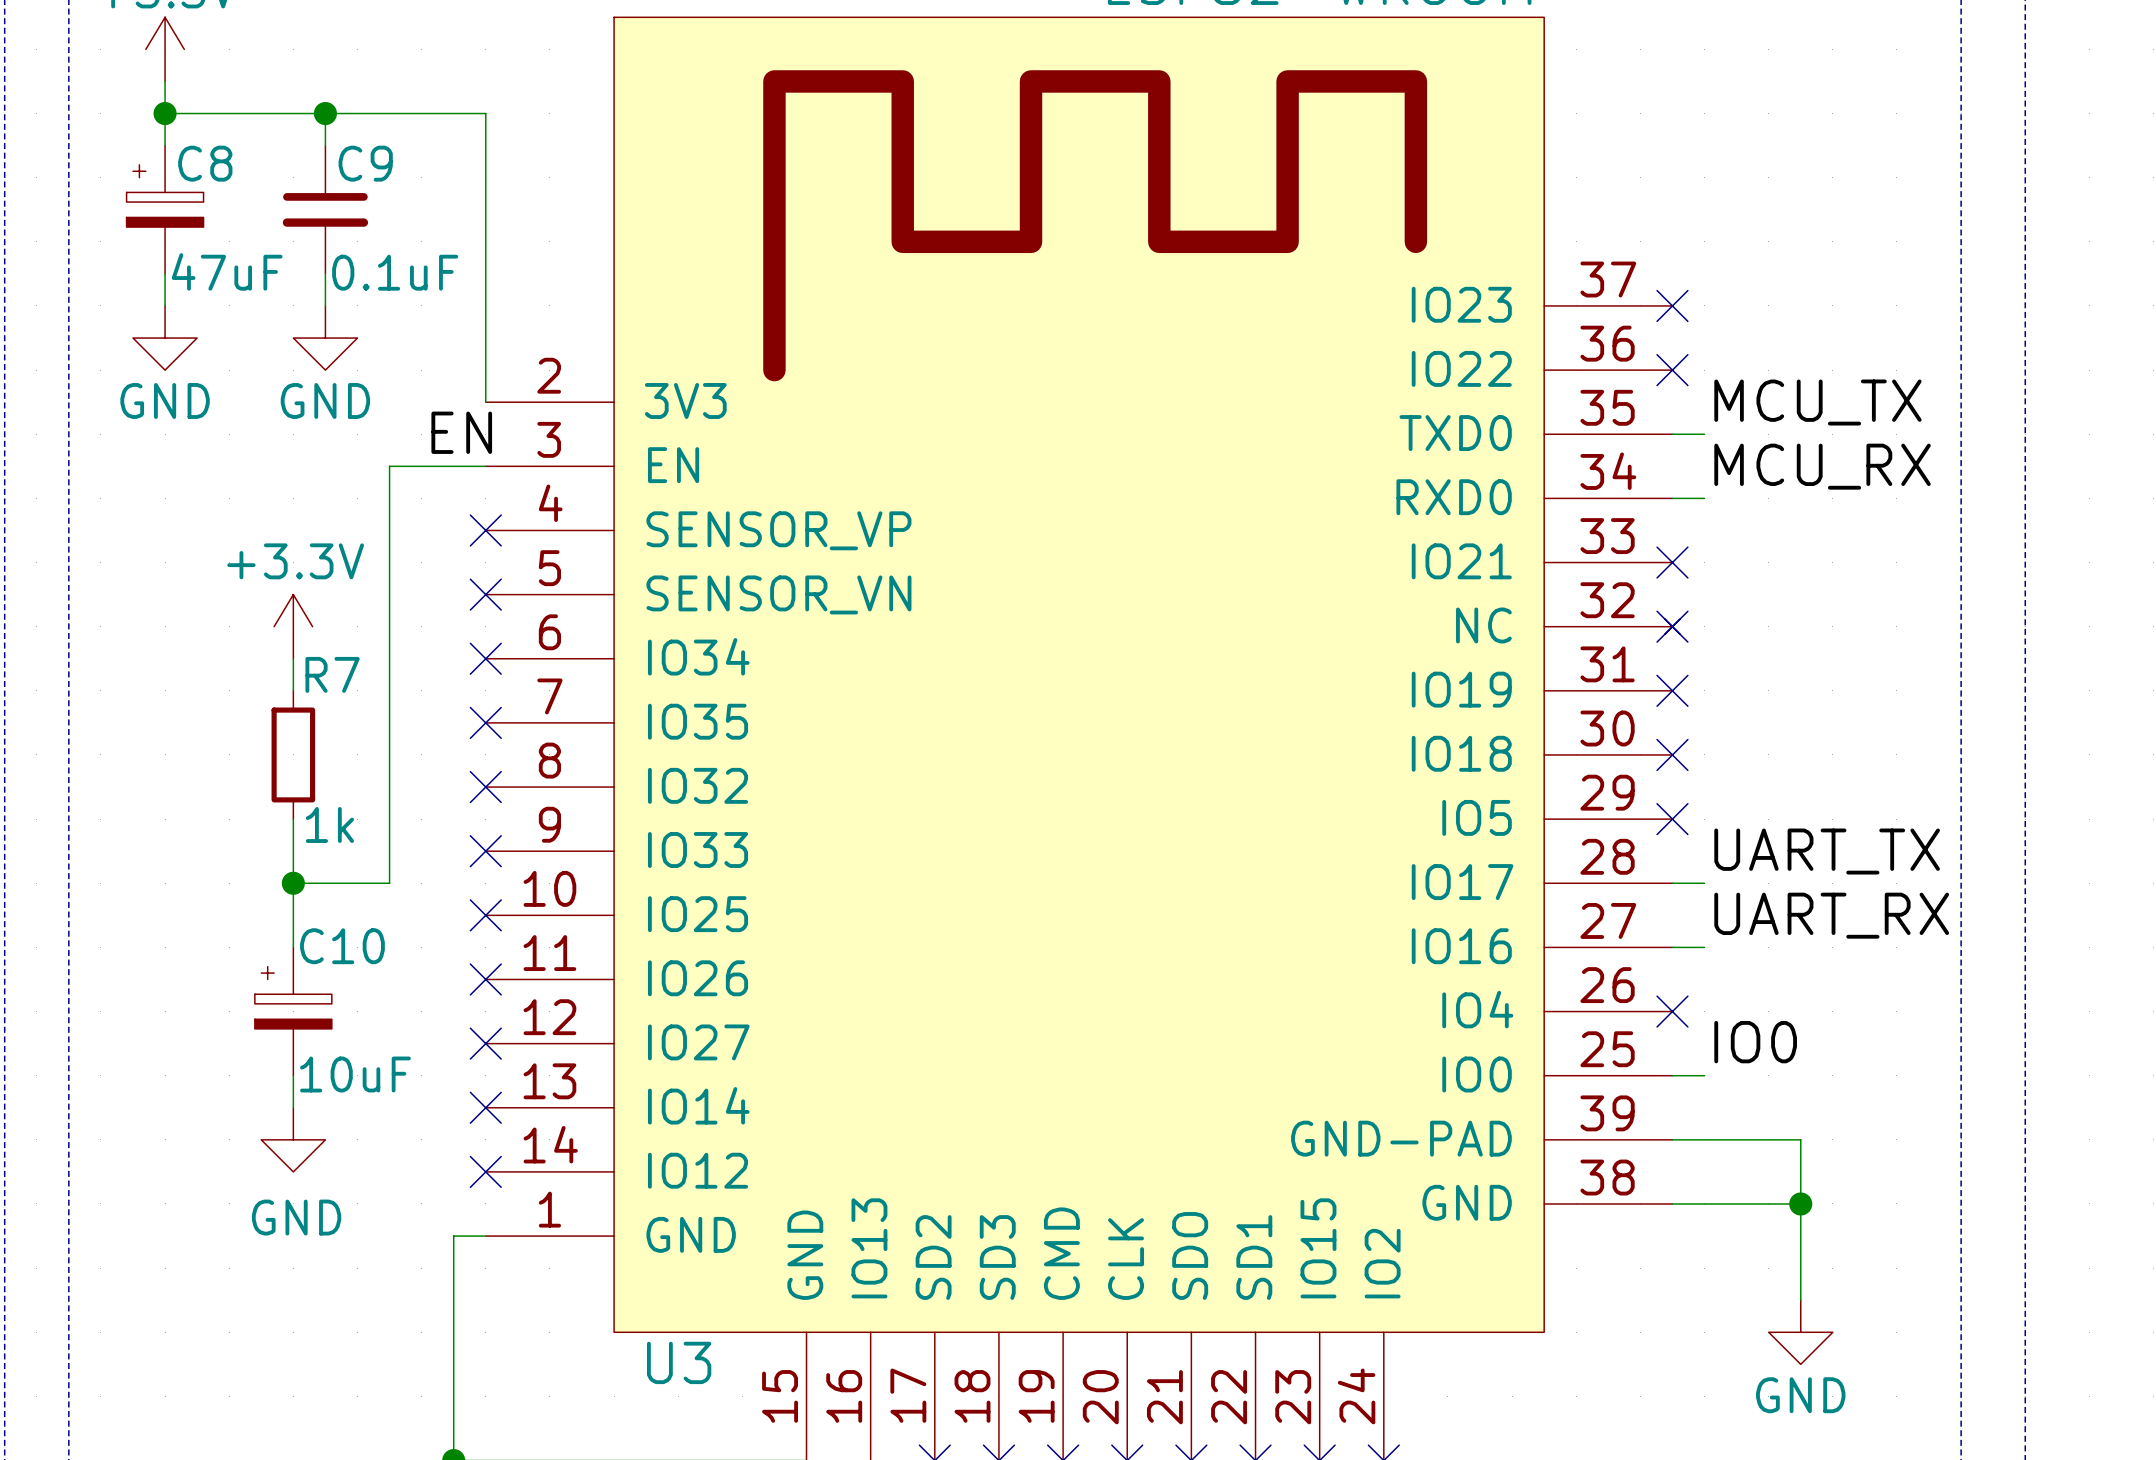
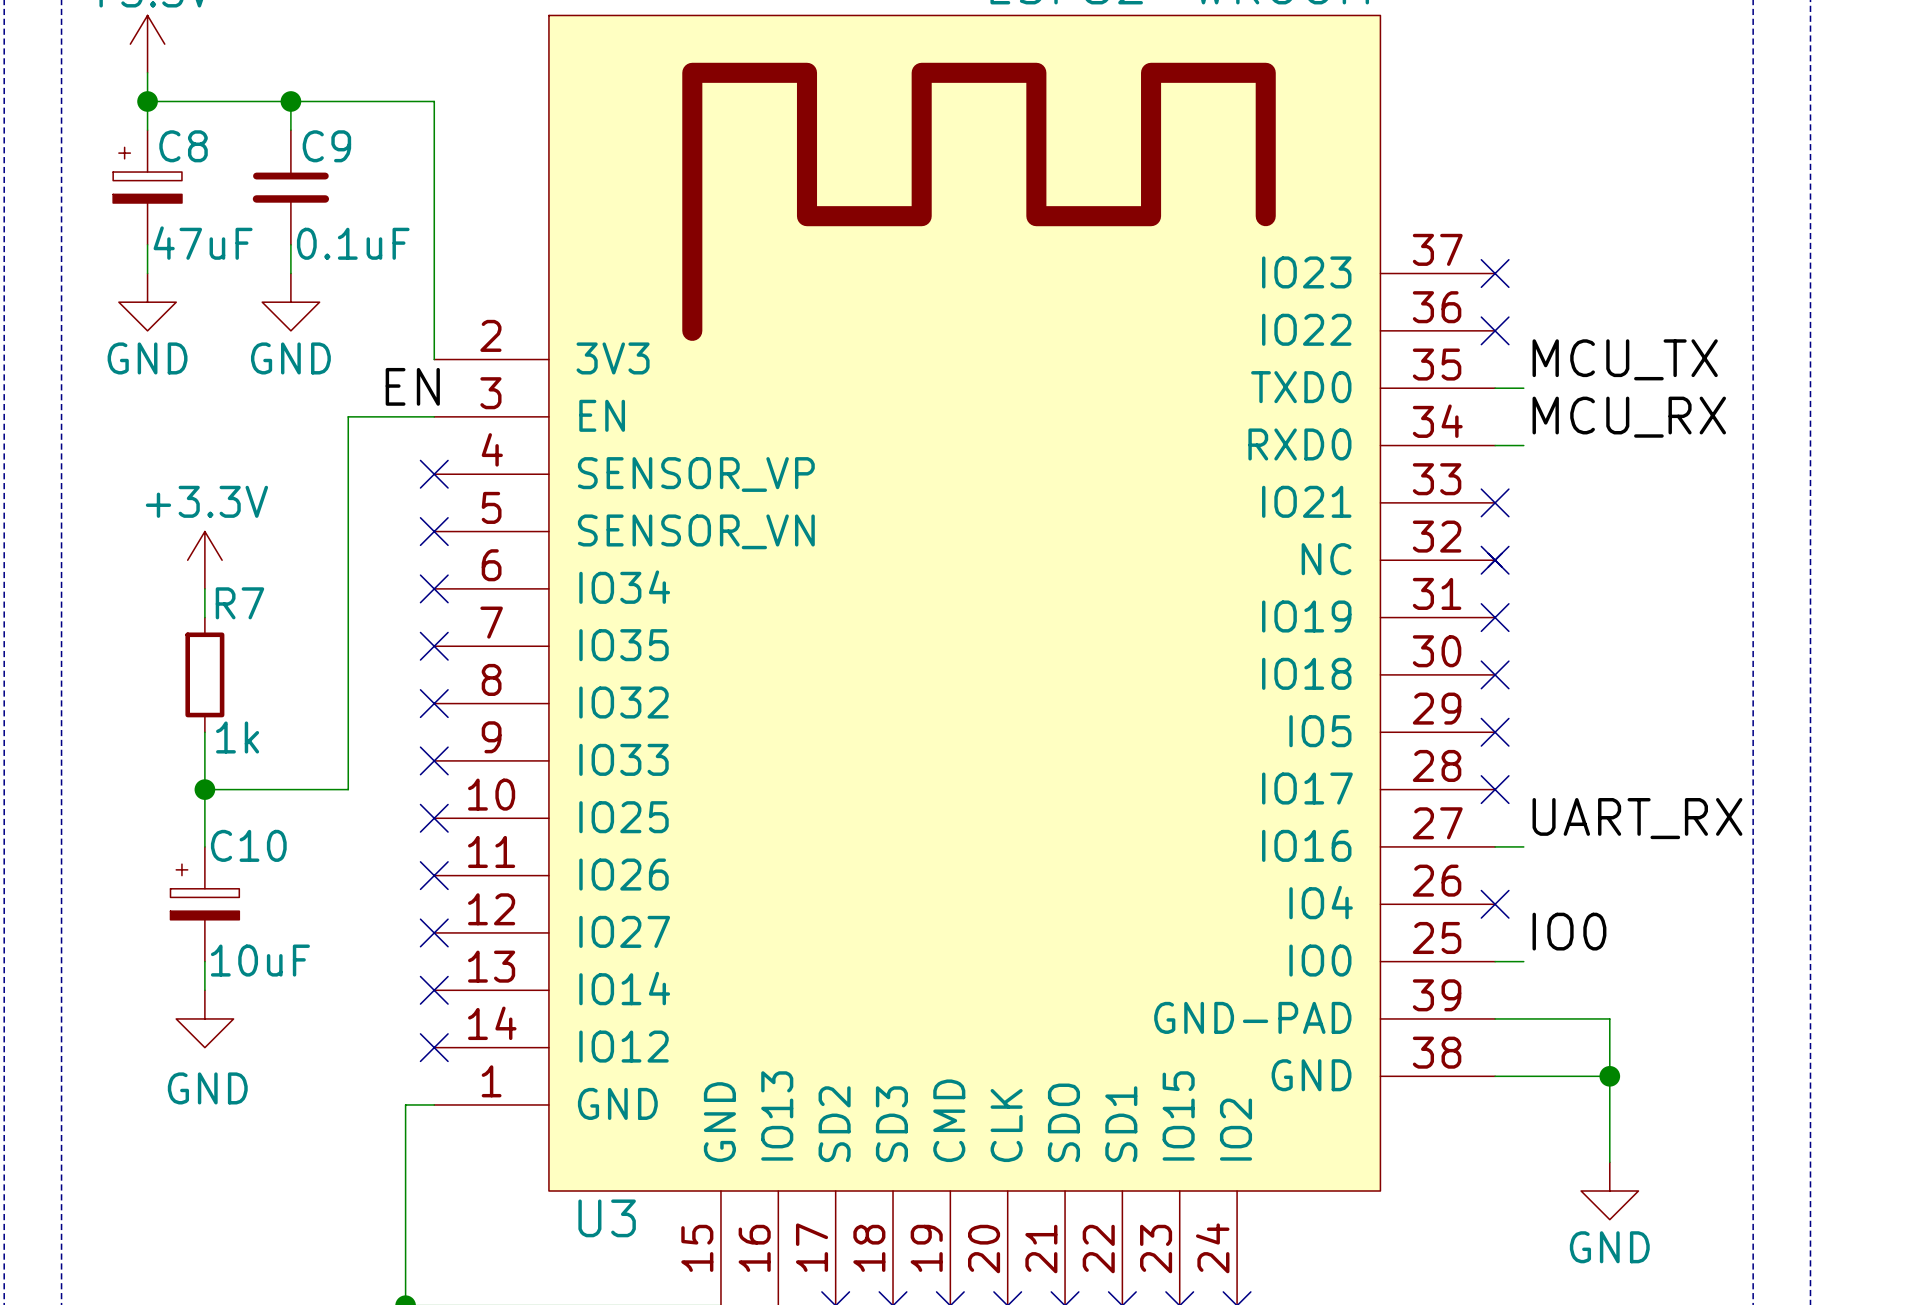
power symbol position: +3.3V (293, 626) -> +3.3V (204, 560)
wire: (293, 658) (293, 690) -> (204, 588) (204, 617)
R7 position: (293, 754) -> (204, 674)
wire: (293, 819) (293, 947) -> (204, 732) (204, 846)
label: UART_TX (1827, 851) -> none
wire: none -> (204, 789) (262, 789)
junction position: (293, 883) -> (204, 789)
wire: (1672, 883) (1704, 883) -> none
no-connect mark: none -> (1495, 789)
C10 position: (293, 1011) -> (204, 904)
wire: (293, 1075) (293, 1107) -> (204, 961) (204, 990)
power symbol position: GND (293, 1139) -> GND (204, 1018)

